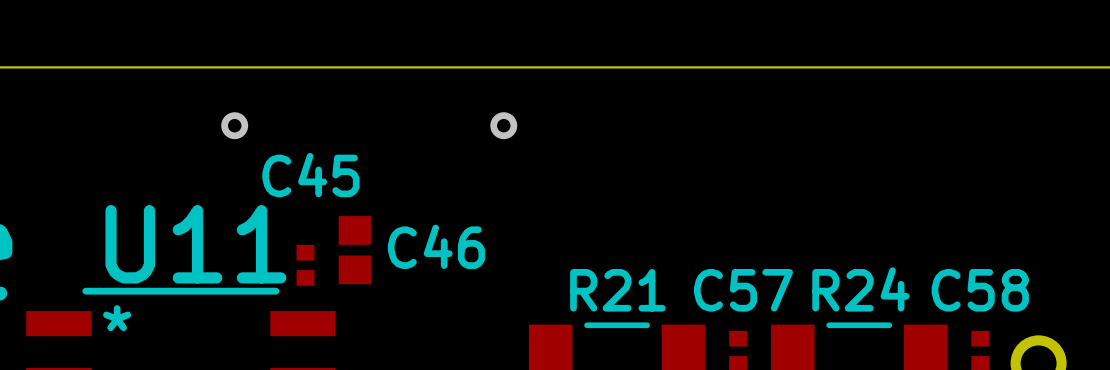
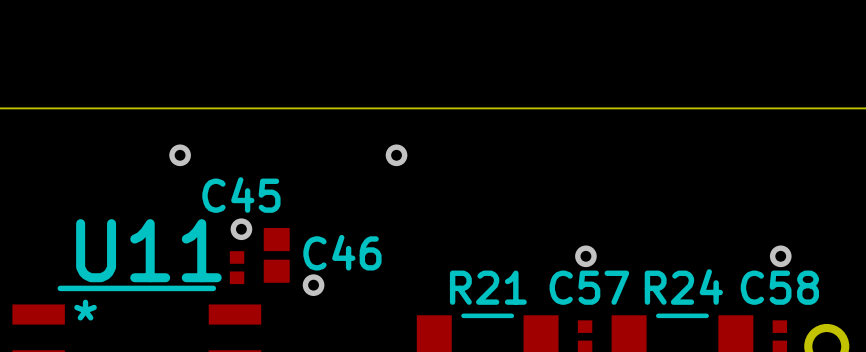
via: none -> (241, 229)
via: none -> (585, 256)
via: none -> (780, 256)
via: none -> (313, 285)

